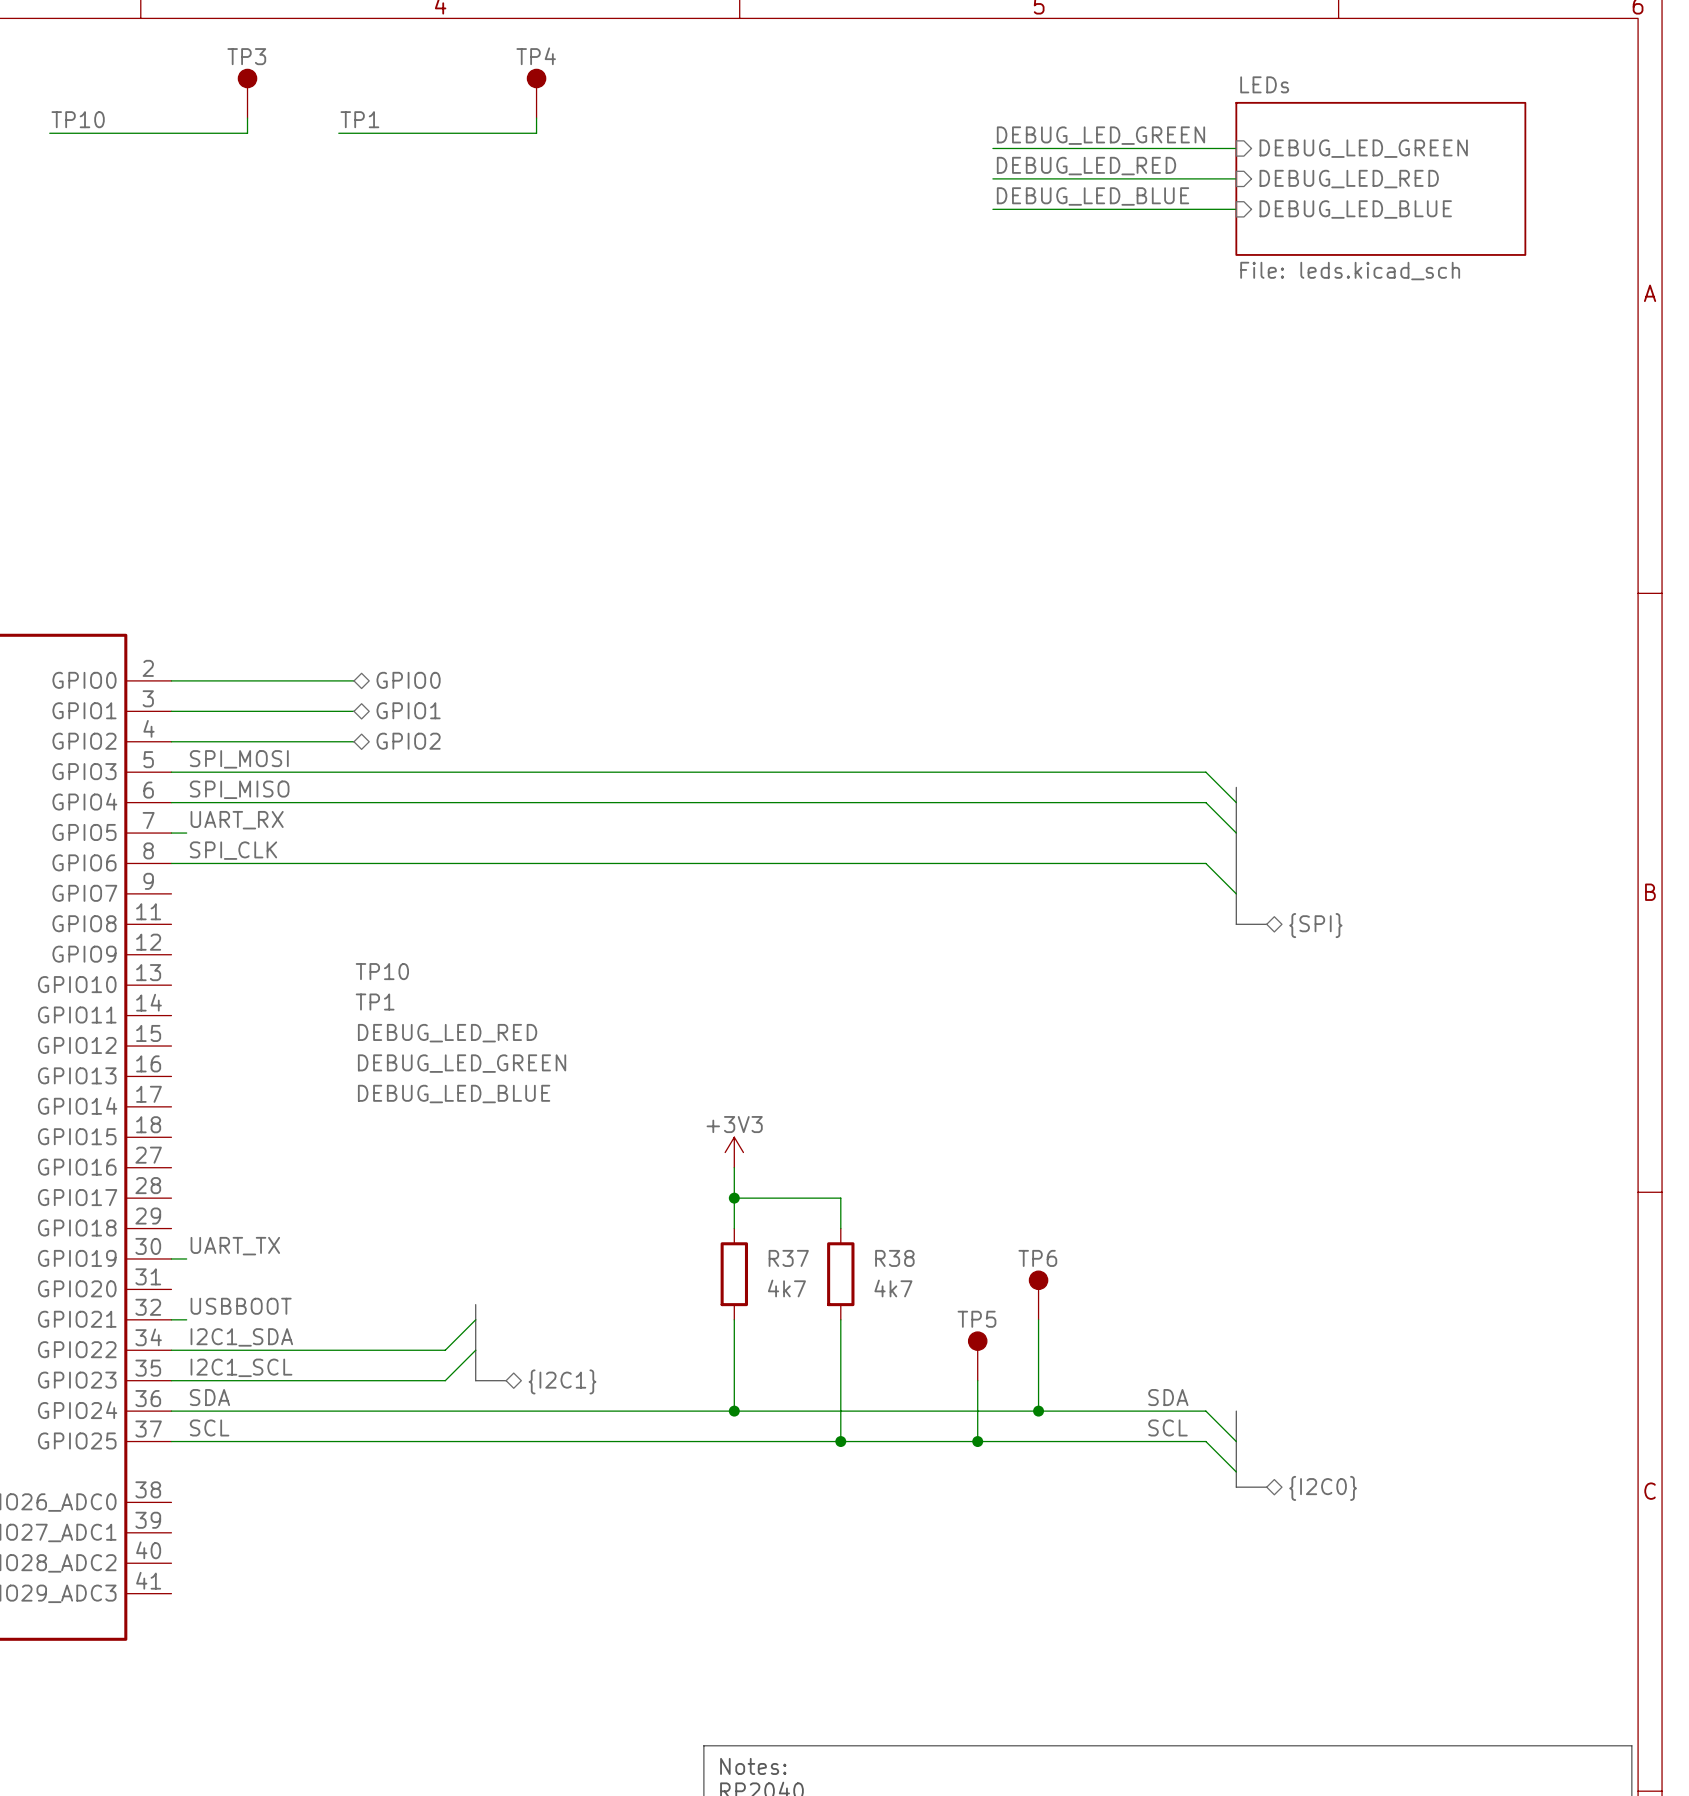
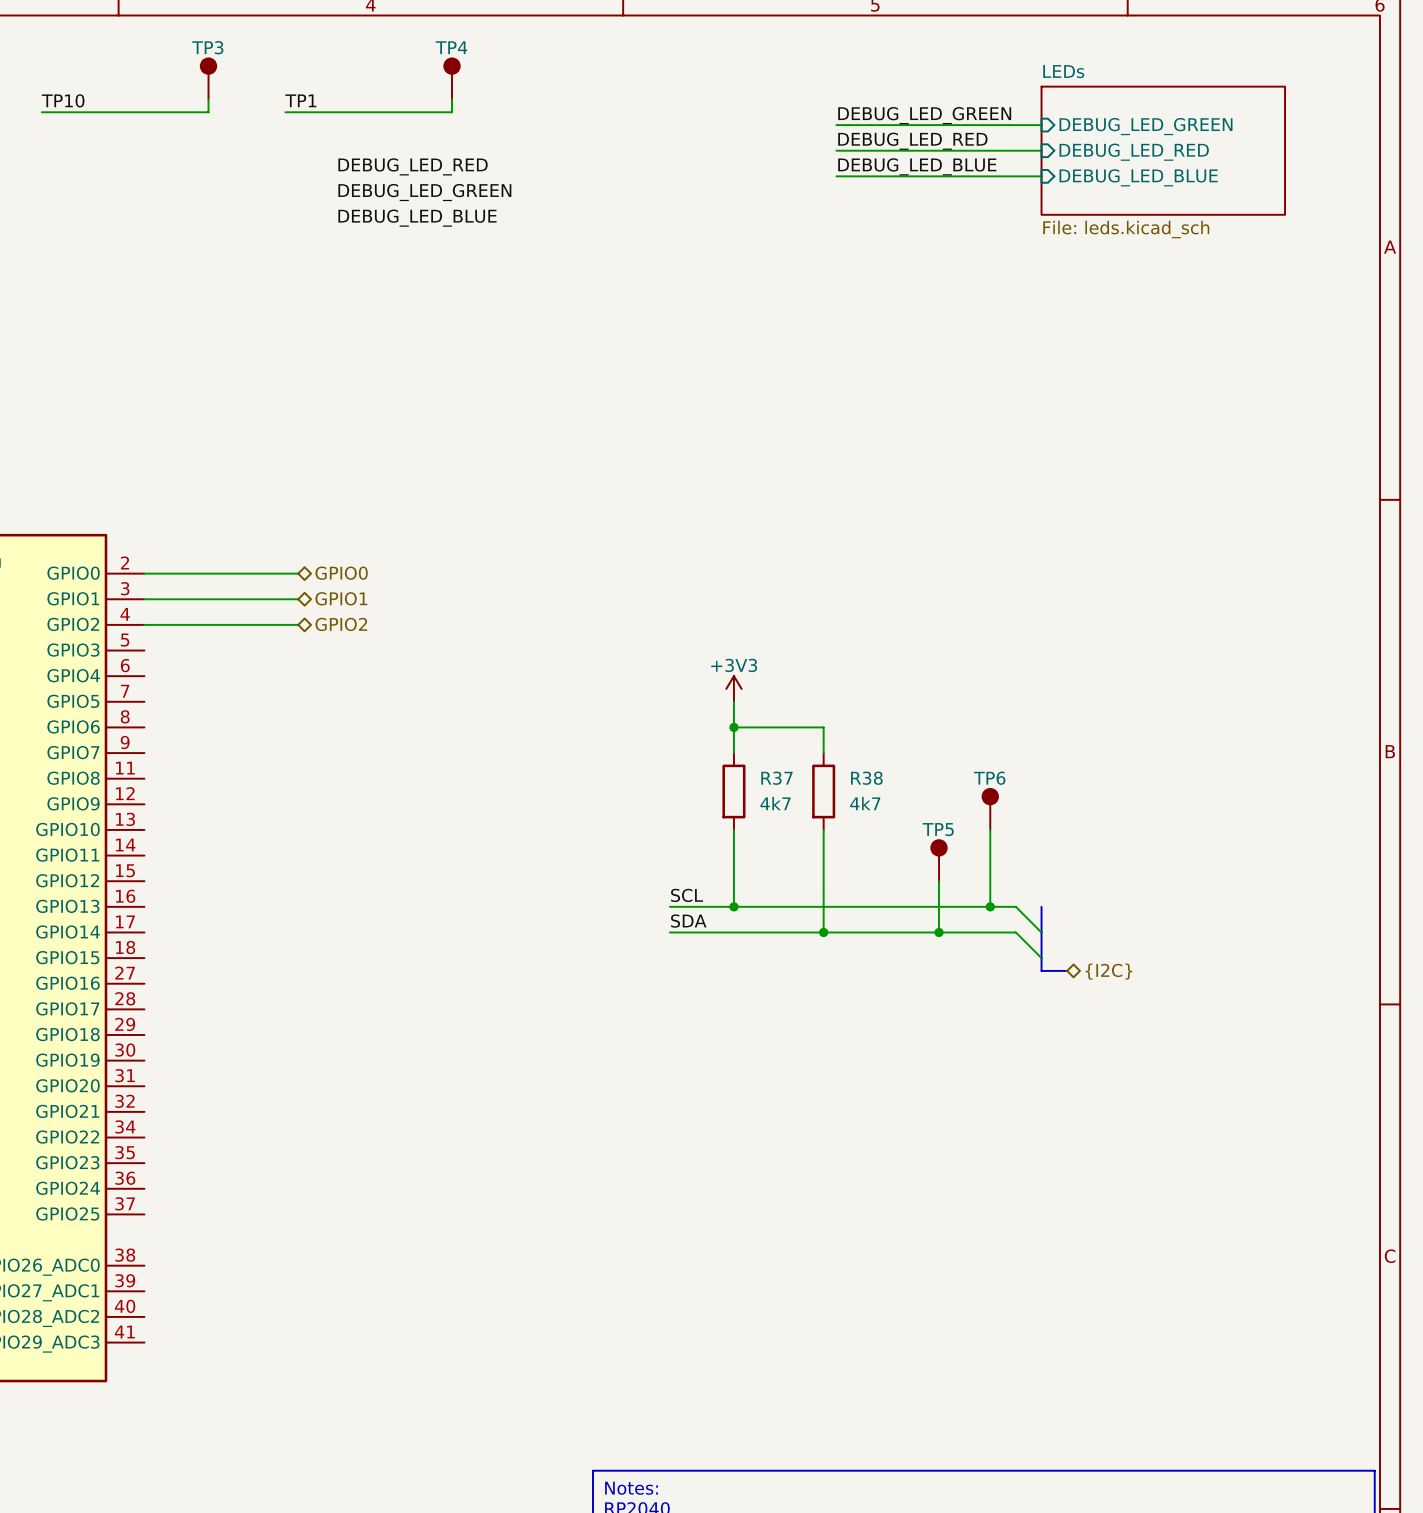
label: none -> DEBUG_LED_RED (413, 166)
label: none -> DEBUG_LED_GREEN (424, 192)
label: none -> DEBUG_LED_BLUE (417, 218)
label: SPI_MOSI (239, 759) -> none
wire: (171, 772) (1205, 772) (1236, 802) -> none
bus: (1236, 787) (1236, 924) (1266, 924) -> none
label: SPI_MISO (239, 789) -> none
wire: (171, 802) (1205, 802) (1236, 833) -> none
power symbol: none -> +3V3 (733, 688)
label: UART_RX (237, 820) -> none
wire: (171, 833) (186, 833) -> none
wire: none -> (733, 701) (733, 753)
label: SPI_CLK (233, 850) -> none
wire: (171, 863) (871, 863) -> none
junction: none -> (733, 727)
wire: (977, 863) (1205, 863) (1236, 893) -> (823, 727) (823, 753)
hierarchical label: {SPI} (1315, 925) -> none
label: TP10 (382, 971) -> none
wire: none -> (733, 829) (733, 906)
wire: none -> (823, 829) (823, 932)
wire: none -> (990, 829) (990, 906)
label: TP1 (375, 1002) -> none
label: DEBUG_LED_RED (447, 1033) -> none
wire: none -> (939, 881) (939, 932)
label: none -> SCL (687, 895)
label: DEBUG_LED_GREEN (462, 1063) -> none
wire: none -> (669, 906) (1015, 906) (1041, 932)
junction: none -> (733, 906)
junction: none -> (990, 906)
bus: none -> (1041, 906) (1041, 970) (1067, 970)
label: none -> SDA (688, 921)
label: DEBUG_LED_BLUE (454, 1094) -> none
wire: none -> (669, 932) (1015, 932) (1041, 958)
junction: none -> (823, 932)
junction: none -> (939, 932)
power symbol: +3V3 (734, 1152) -> none
hierarchical label: none -> {I2C} (1108, 971)
wire: (734, 1167) (734, 1228) -> none
wire: (734, 1198) (840, 1198) (840, 1228) -> none
junction: (734, 1198) -> none
label: UART_TX (235, 1246) -> none
wire: (171, 1258) (186, 1258) -> none
R37 position: (734, 1274) -> (733, 791)
R38 position: (840, 1274) -> (823, 791)
TP6 position: (1038, 1295) -> (990, 809)
bus: (475, 1304) (475, 1380) (506, 1380) -> none
label: USBBOOT (241, 1306) -> none
wire: (171, 1319) (186, 1319) -> none
wire: (475, 1319) (445, 1350) (171, 1350) -> none
wire: (734, 1319) (734, 1411) -> none
wire: (840, 1319) (840, 1441) -> none
wire: (1038, 1319) (1038, 1411) -> none
label: I2C1_SDA (241, 1337) -> none
wire: (475, 1350) (445, 1380) (171, 1380) -> none
TP5 position: (977, 1356) -> (939, 860)
label: I2C1_SCL (241, 1367) -> none
wire: (977, 1380) (977, 1441) -> none
hierarchical label: {I2C1} (562, 1381) -> none
label: SDA (209, 1397) -> none
label: SDA (1168, 1397) -> none
wire: (171, 1411) (1205, 1411) (1236, 1441) -> none
junction: (734, 1411) -> none
junction: (1038, 1411) -> none
bus: (1236, 1411) (1236, 1487) (1266, 1487) -> none
label: SCL (209, 1427) -> none
label: SCL (1167, 1427) -> none
wire: (171, 1441) (1205, 1441) (1236, 1471) -> none
junction: (840, 1441) -> none
junction: (977, 1441) -> none
hierarchical label: {I2C0} (1323, 1488) -> none

